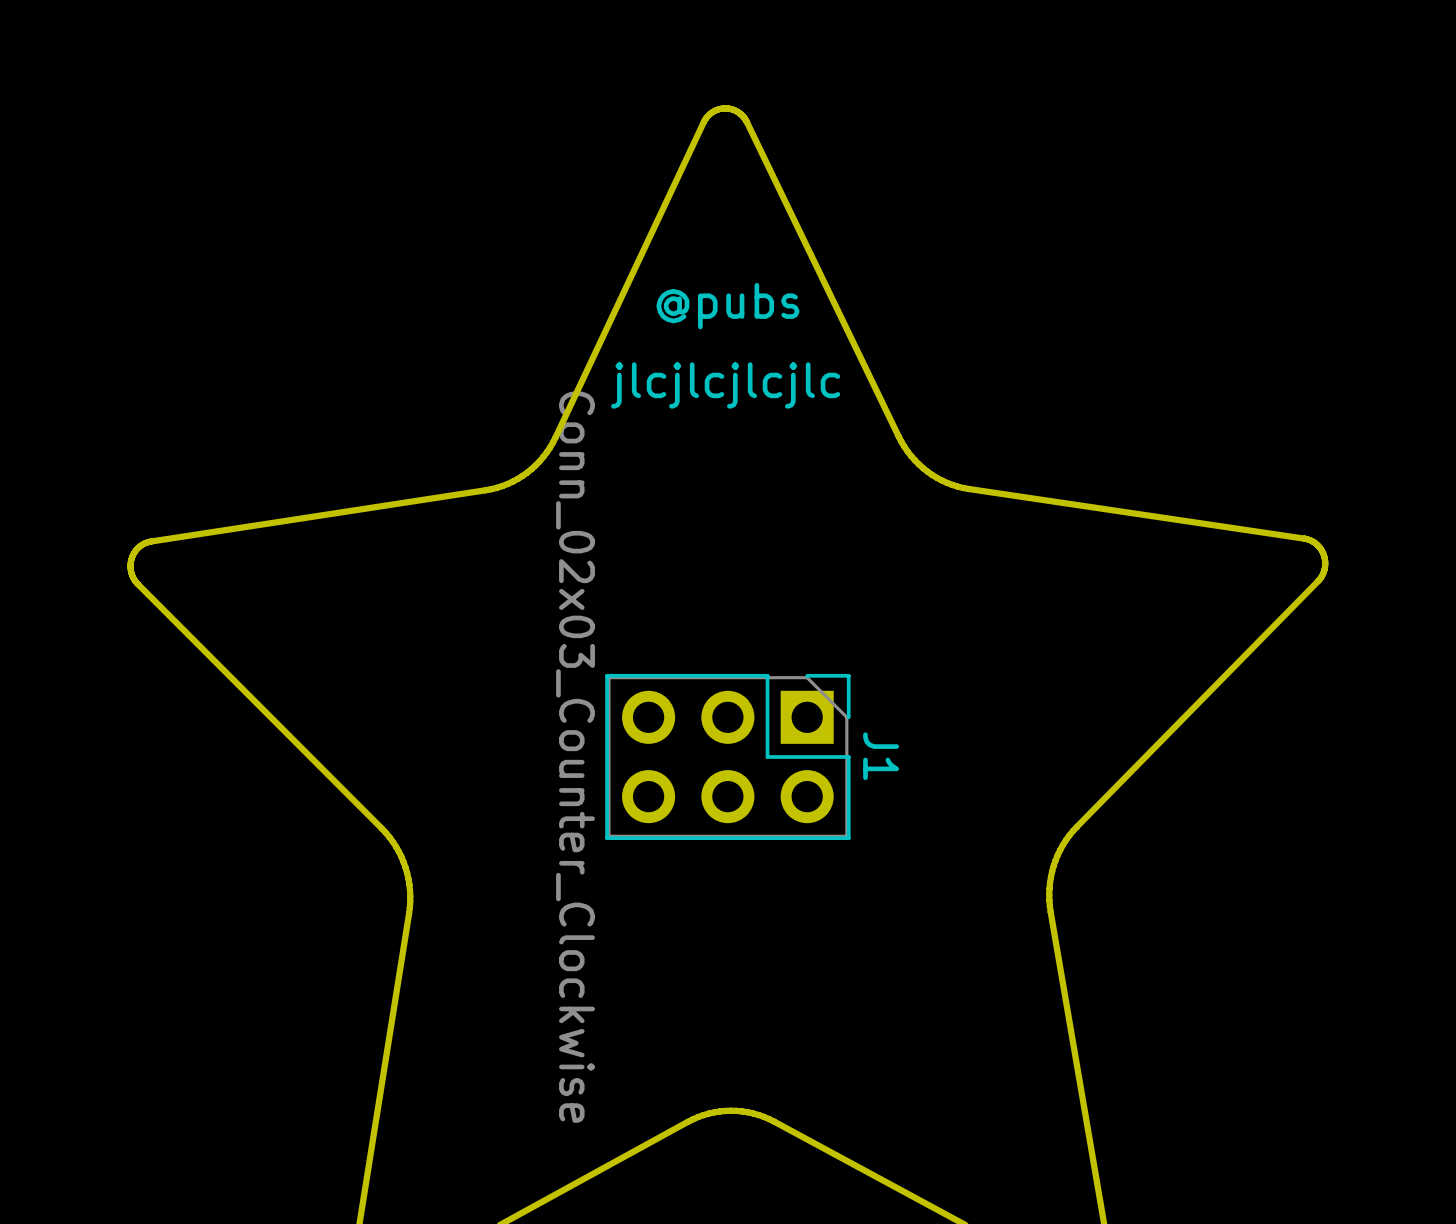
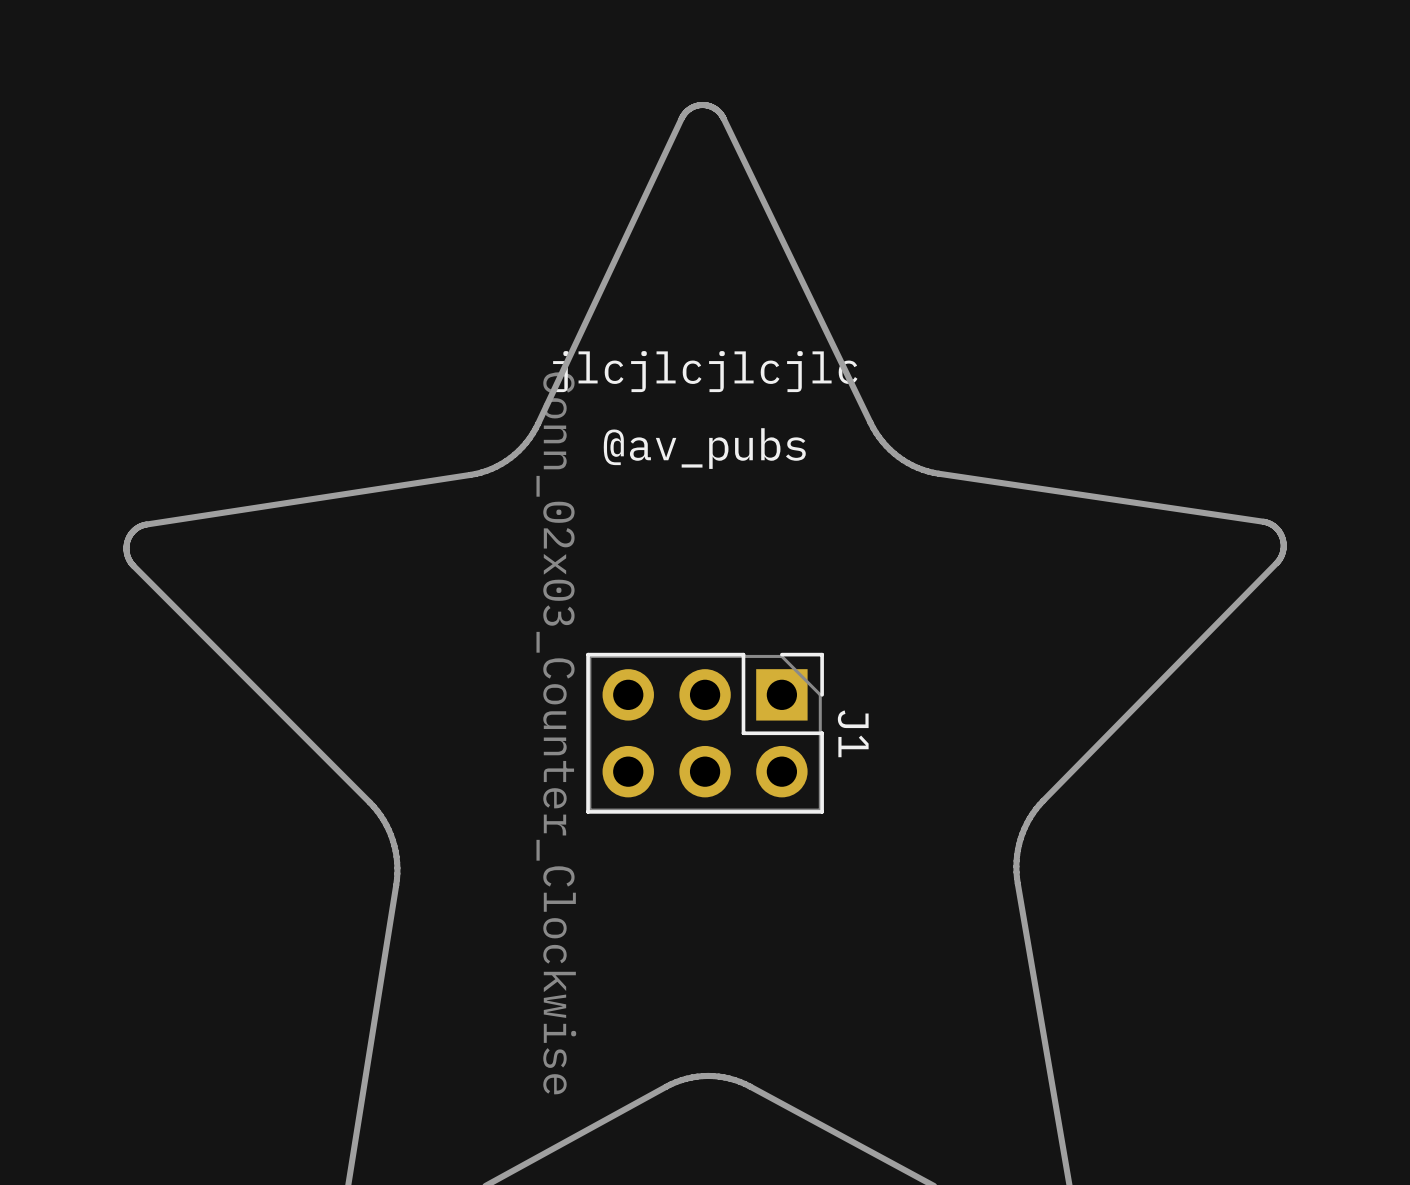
text: @pubs (727, 306) -> none
text: none -> @av_pubs (704, 448)

